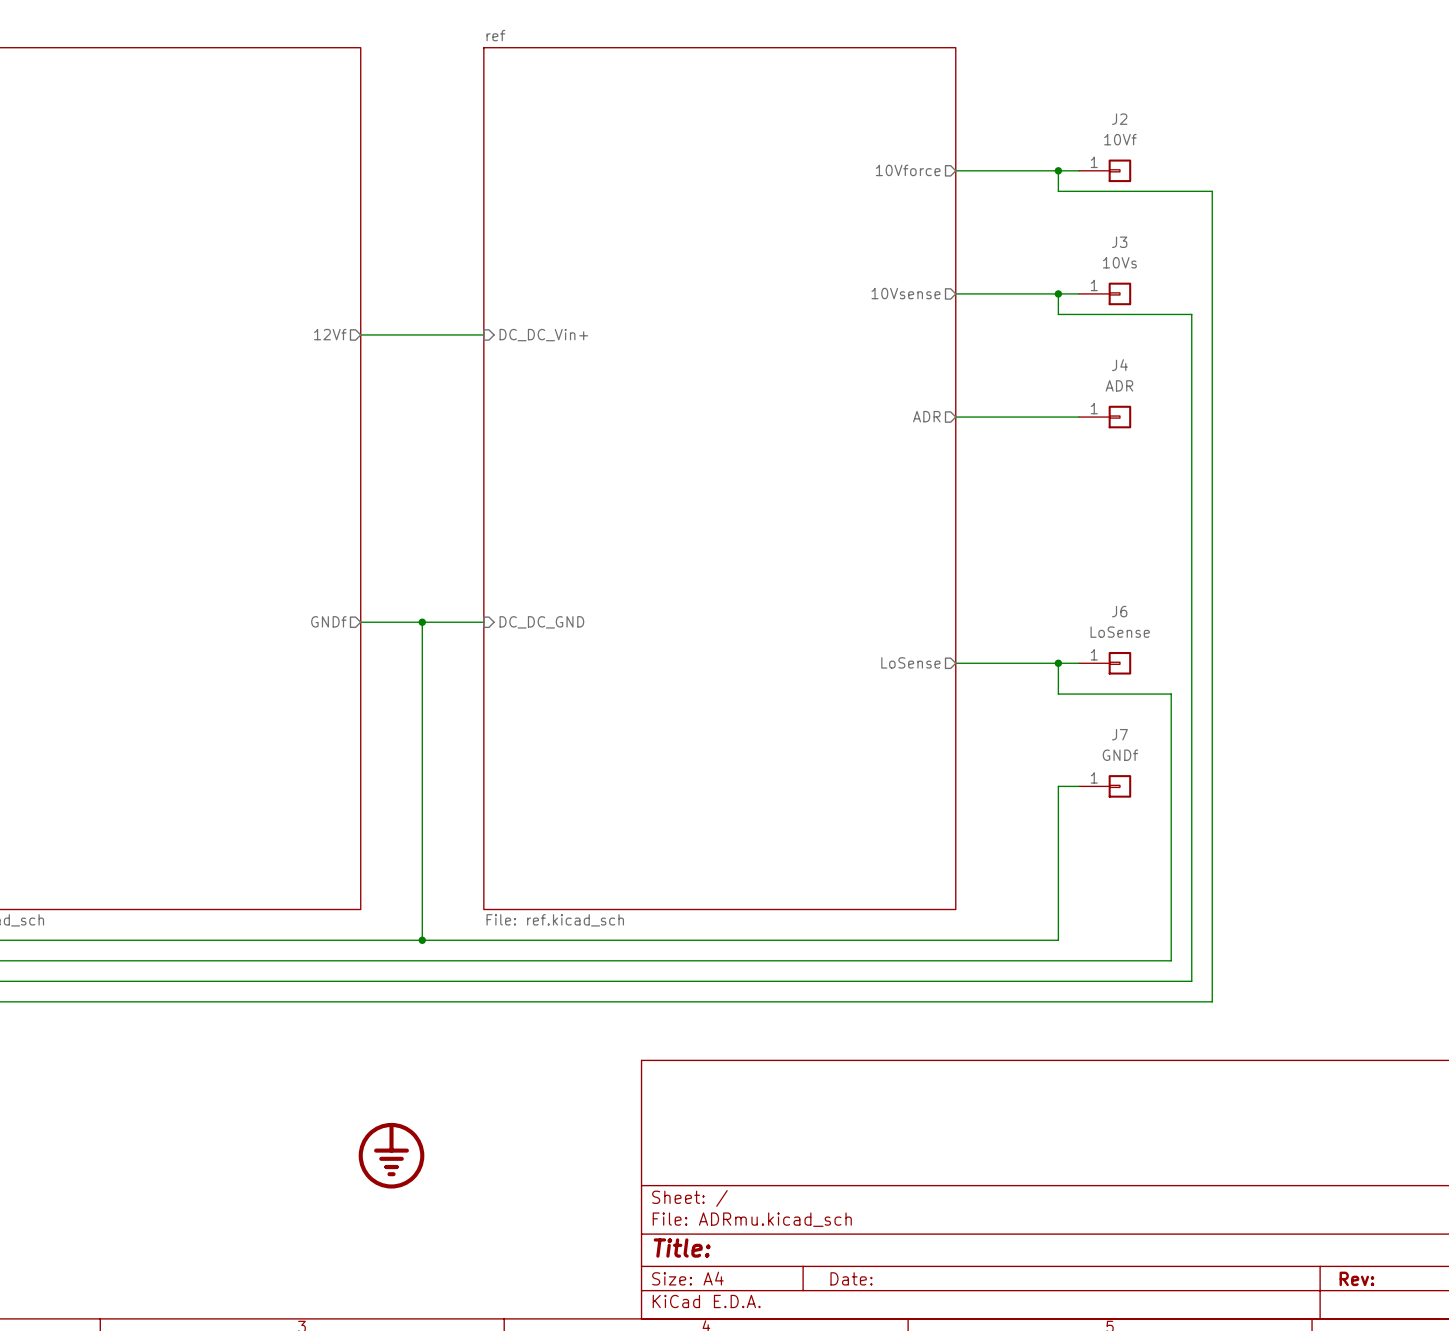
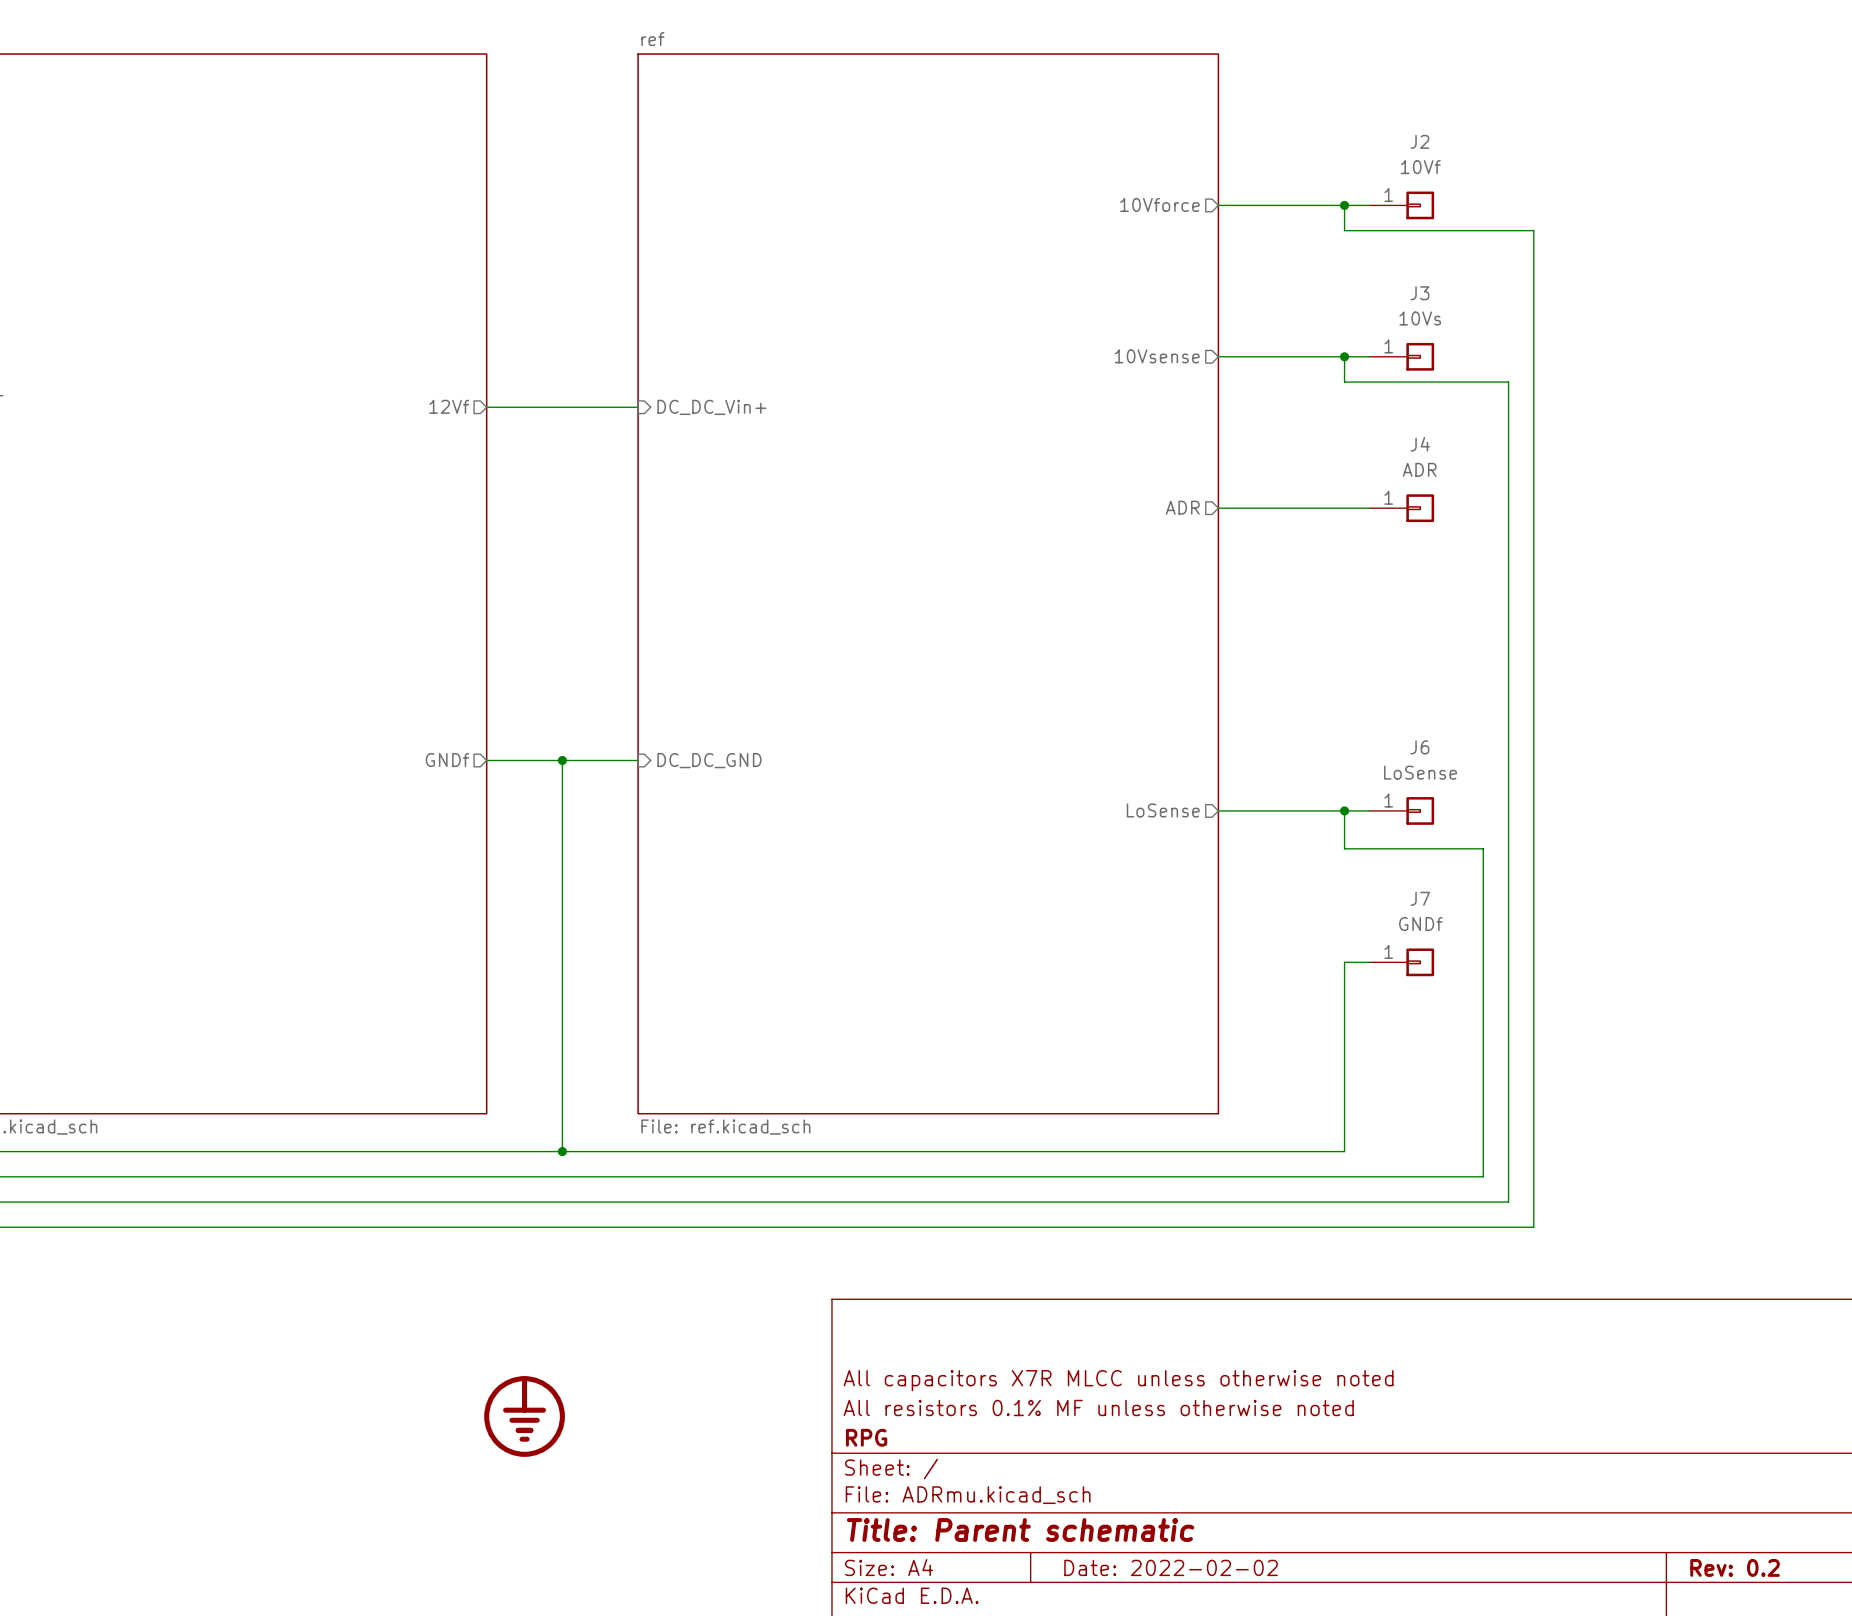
title block: none -> All capacitors X7R MLCC unless otherwise noted (1118, 1380)
title block: none -> All resistors 0.1% MF unless otherwise noted (1098, 1407)
title block: none -> RPG (866, 1437)
title block: Title: (682, 1248) -> Title: Parent schematic (1020, 1529)
title block: Date: (851, 1278) -> Date: 2022-02-02 (1171, 1567)
title block: Rev: (1356, 1278) -> Rev: 0.2 (1735, 1567)

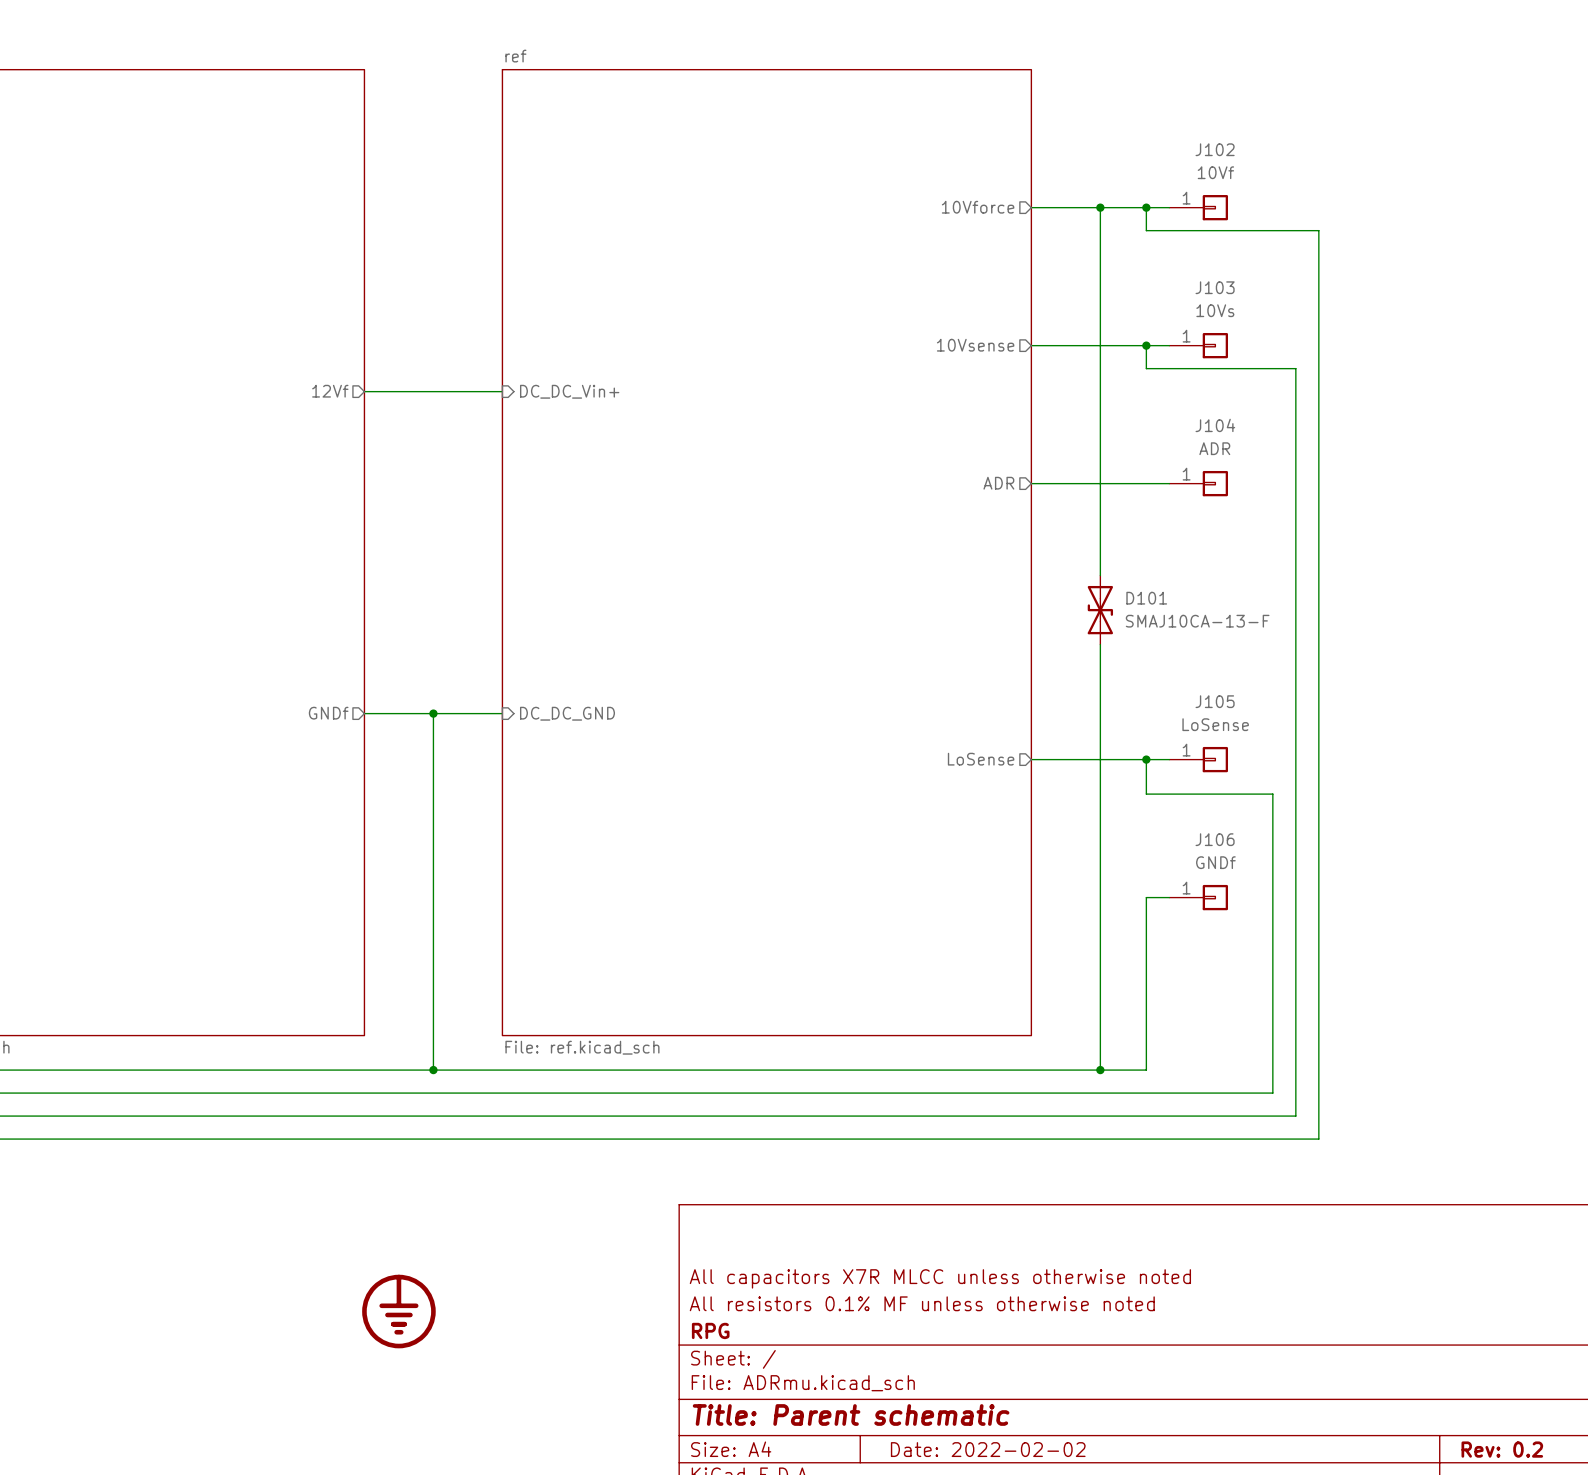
J2 name: J2 (1419, 141) -> J102 (1215, 149)
wire: none -> (1100, 207) (1100, 575)
junction: none -> (1100, 207)
J3 name: J3 (1419, 293) -> J103 (1215, 287)
J4 name: J4 (1420, 444) -> J104 (1215, 425)
D101: none -> SMAJ10CA-13-F (1100, 610)
wire: none -> (1100, 644) (1100, 1070)
J6 name: J6 (1419, 747) -> J105 (1215, 701)
J7 name: J7 (1420, 898) -> J106 (1215, 839)
junction: none -> (1100, 1070)

